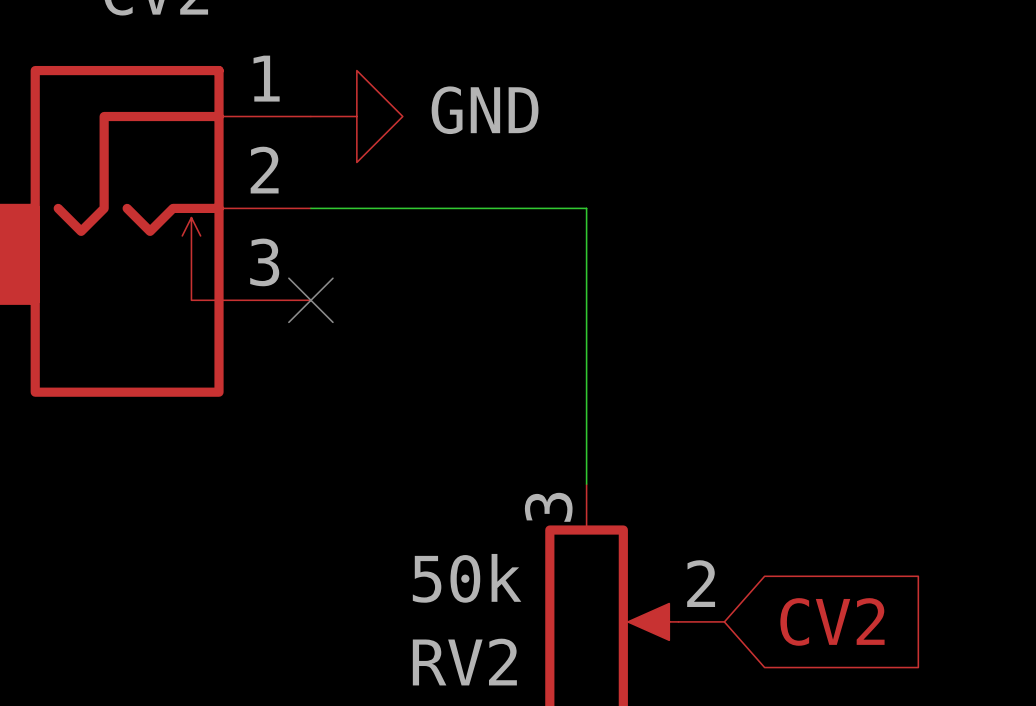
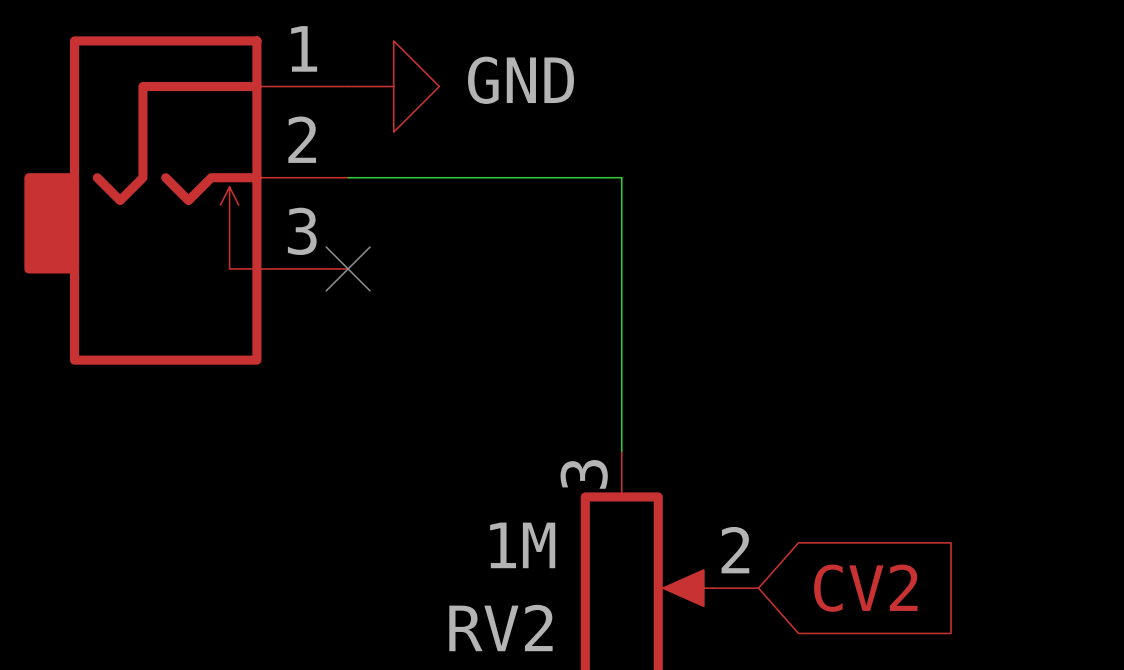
RV2 value: 50k (467, 578) -> 1M (522, 545)

